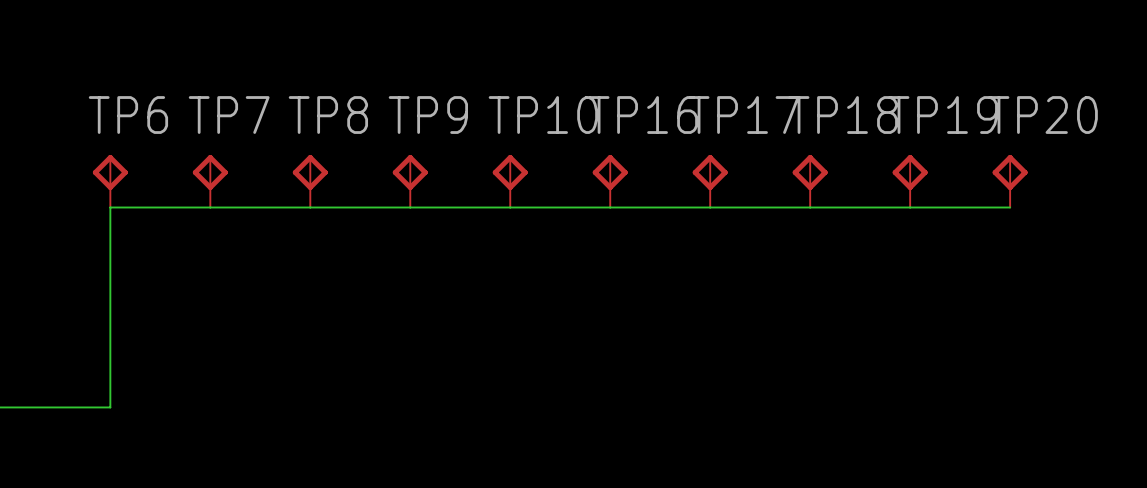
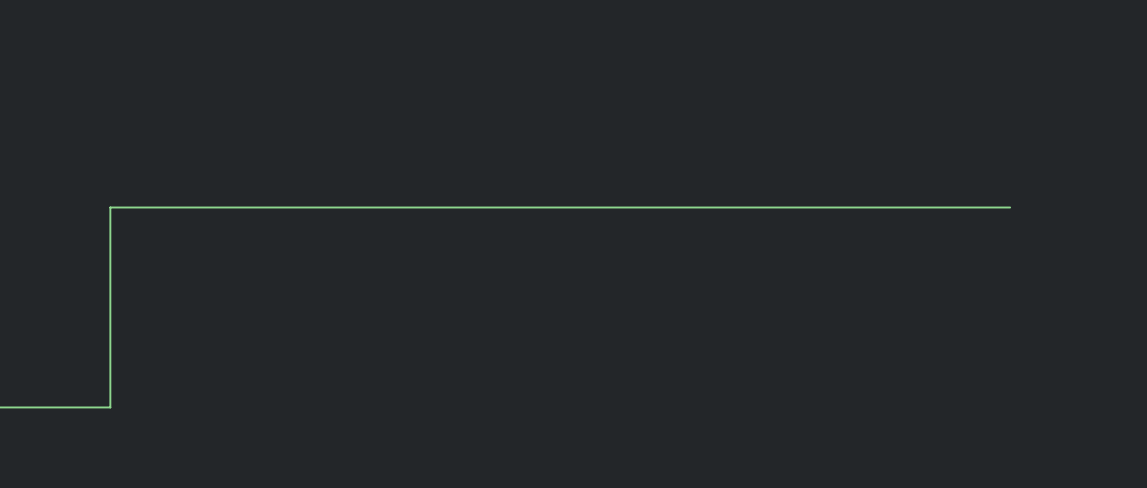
TP6: (110, 181) -> none
TP7: (210, 181) -> none
TP8: (310, 181) -> none
TP9: (410, 181) -> none
TP10: (510, 181) -> none
TP16: (610, 181) -> none
TP17: (710, 181) -> none
TP18: (810, 181) -> none
TP19: (910, 181) -> none
TP20: (1010, 181) -> none

